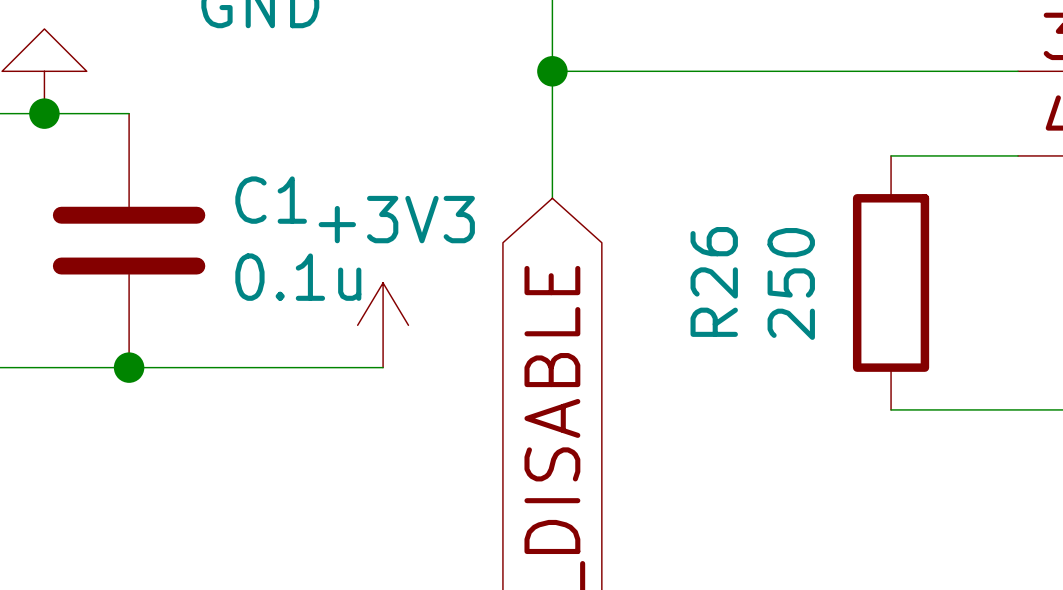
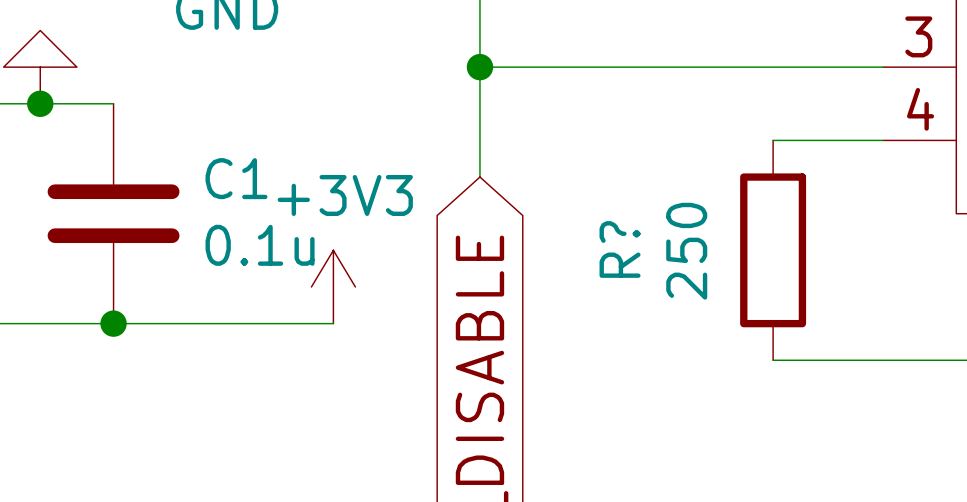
R26 name: R26 (714, 281) -> R? (620, 249)

